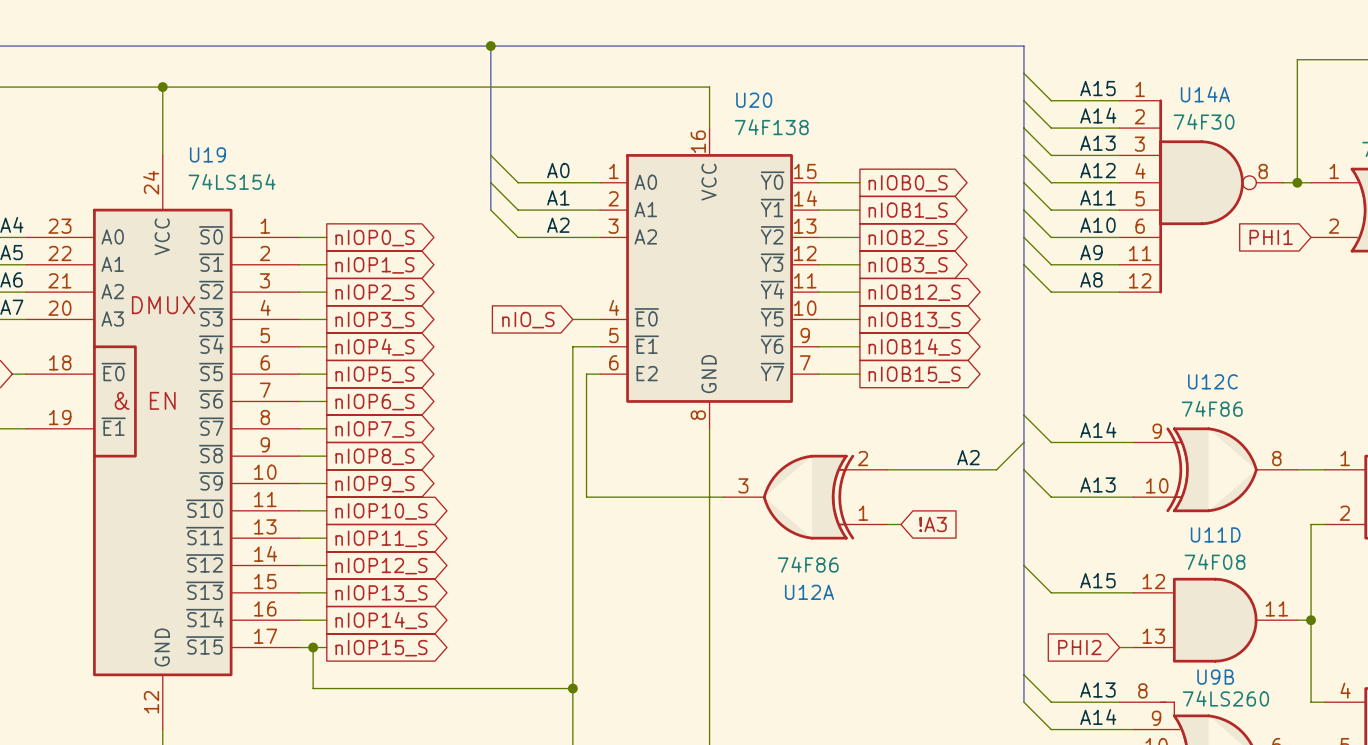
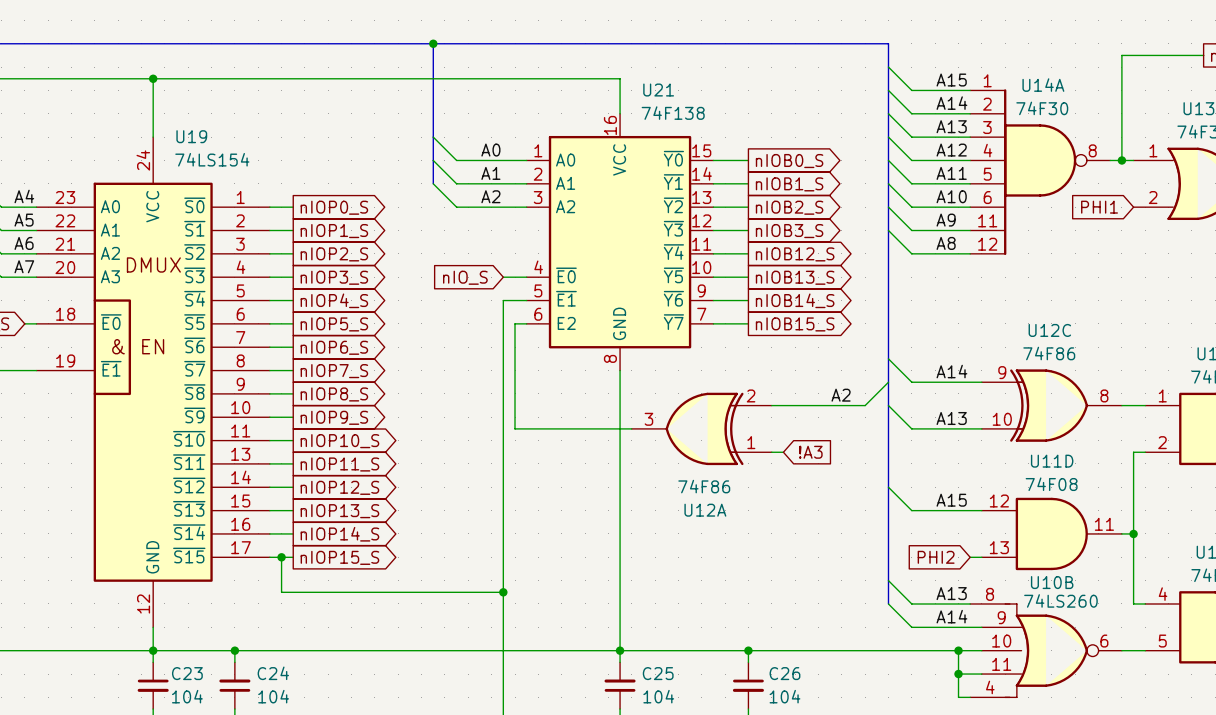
U20 name: U20 (754, 100) -> U21 (658, 90)
U9B name: U9B (1215, 677) -> U10B (1052, 582)

